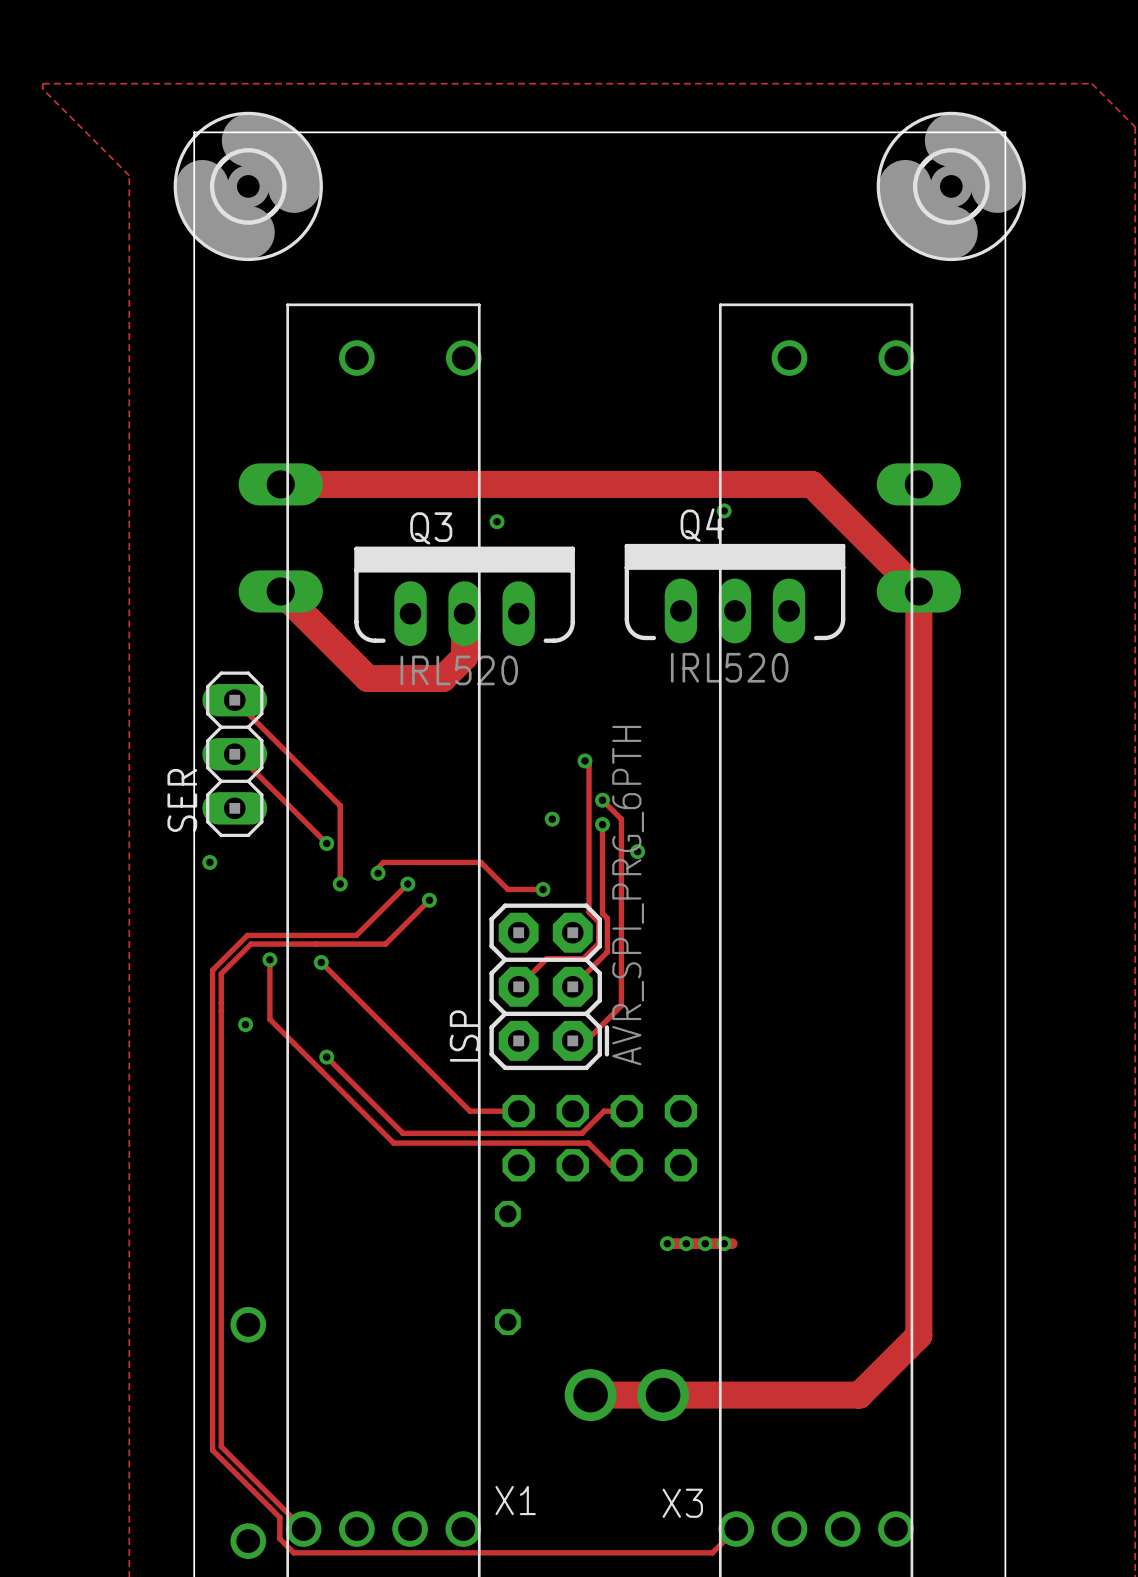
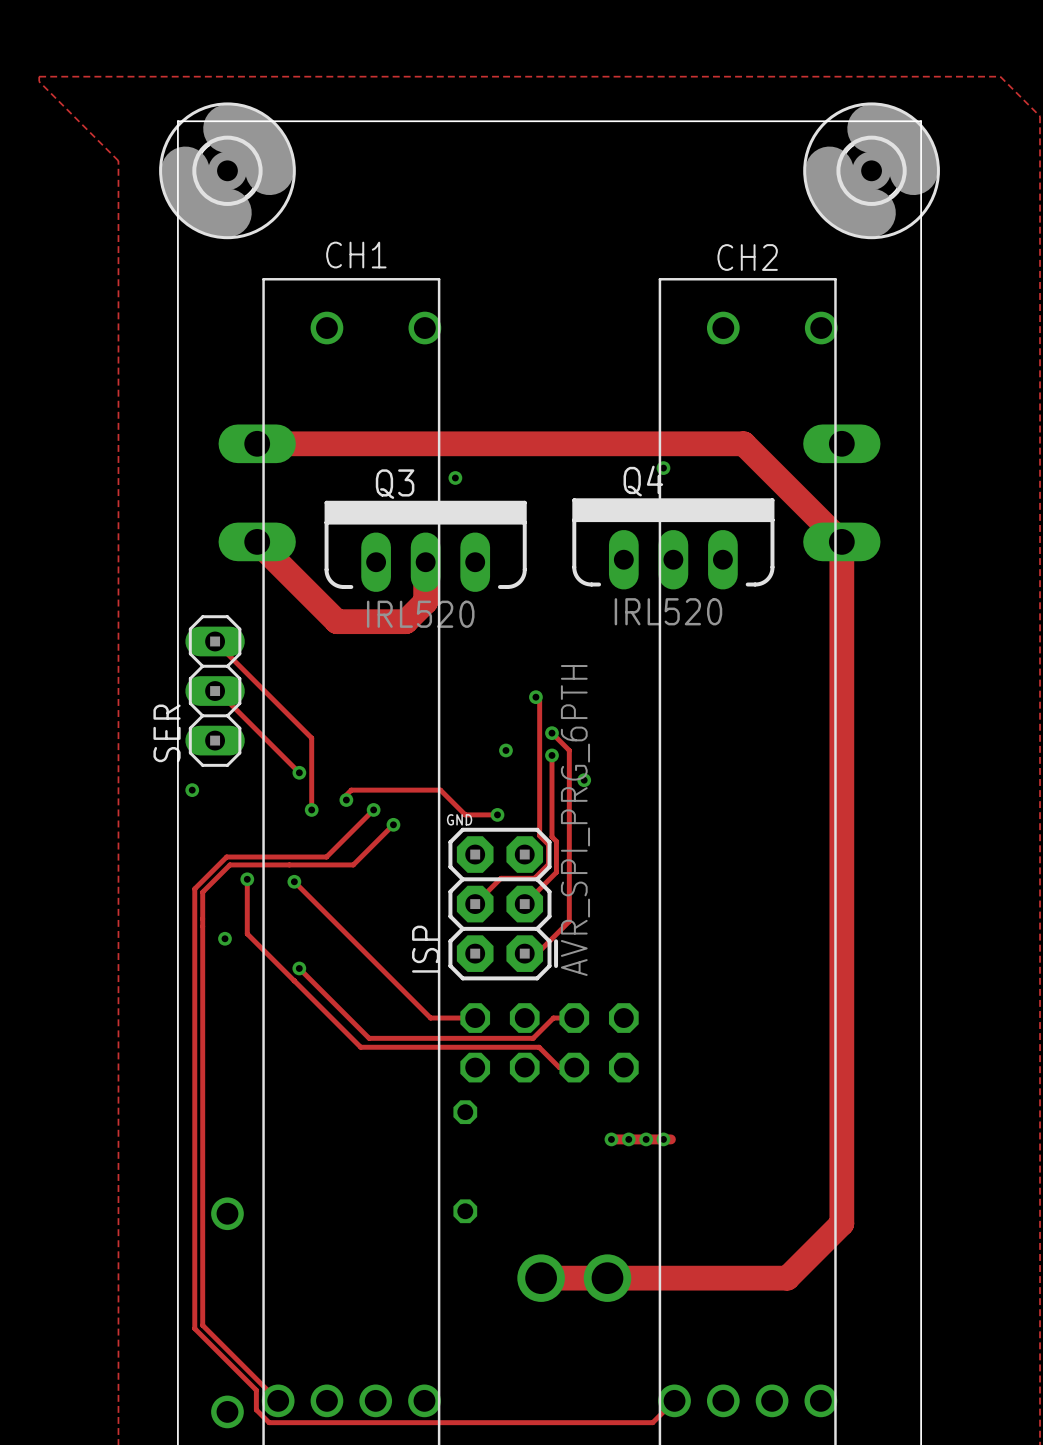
text: none -> GND (459, 819)
X1 name: X1 (515, 1500) -> CH1 (356, 255)
X3 name: X3 (682, 1503) -> CH2 (747, 257)

